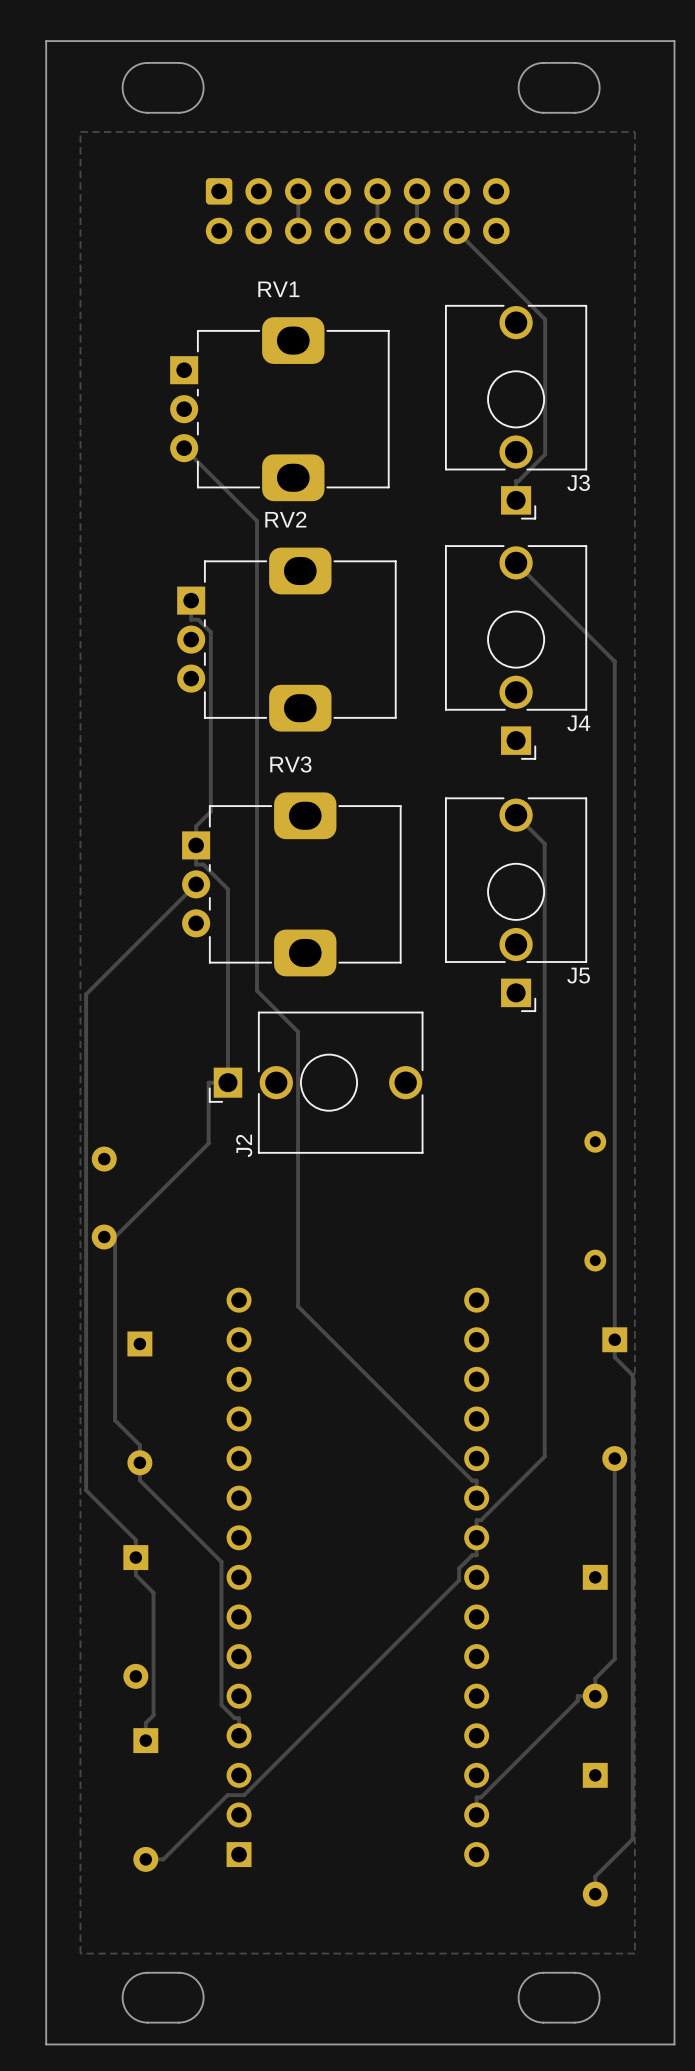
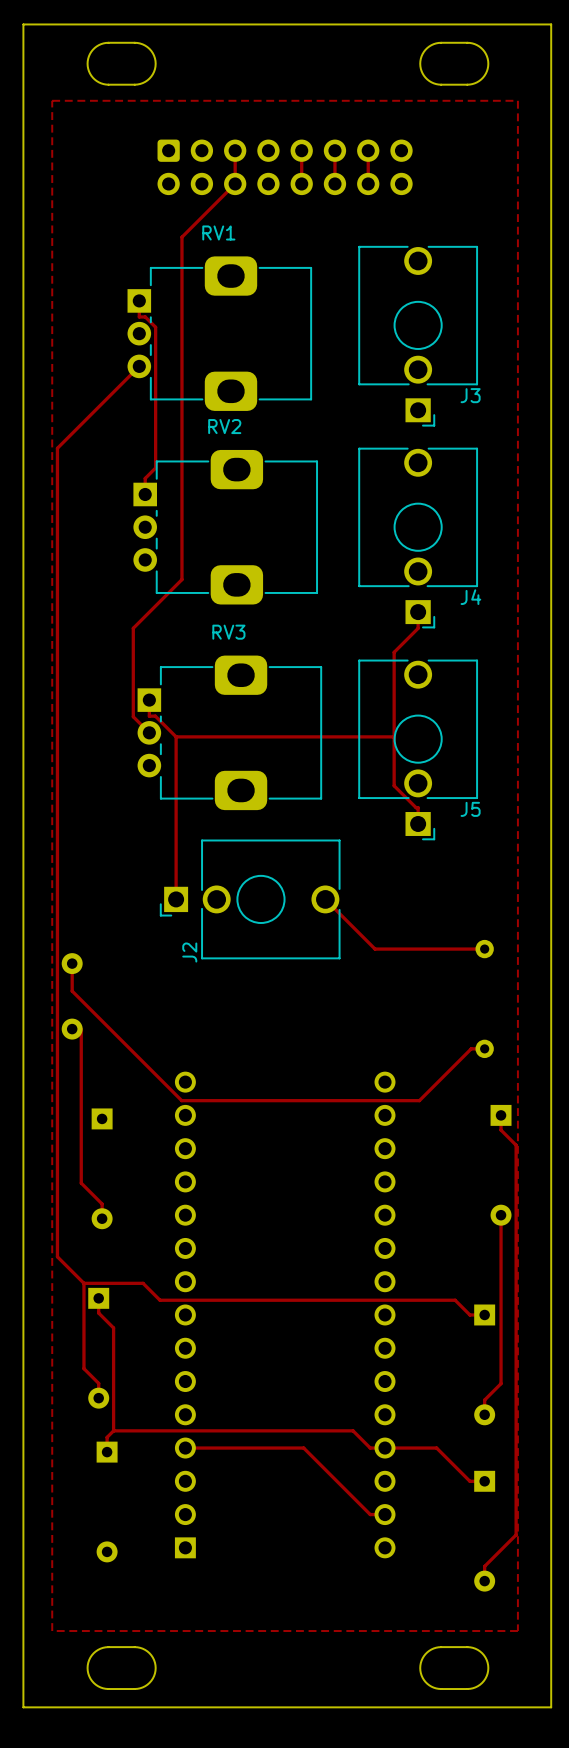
track: (456, 230) (545, 319) (545, 454) (518, 481) (516, 481) (516, 500) -> none
track: (184, 448) (257, 520) (257, 990) (298, 1031) (298, 1306) (472, 1480) (476, 1480) (476, 1498) -> (139, 366) (57, 448) (57, 1256) (83, 1283)
track: (516, 562) (614, 661) (614, 1339) -> none
track: (191, 600) (191, 619) (198, 619) (210, 632) (210, 811) (196, 826) (196, 845) -> (145, 494) (145, 478) (155, 468) (155, 327) (145, 316) (139, 316) (139, 300)
track: none -> (418, 612) (418, 628) (394, 652) (394, 785) (418, 807) (418, 823)
track: (516, 815) (544, 843) (544, 1456) (481, 1520) (476, 1520) (476, 1555) (472, 1555) (459, 1568) (459, 1580) (244, 1795) (227, 1795) (163, 1859) (145, 1859) -> none
track: (196, 884) (86, 994) (86, 1490) (135, 1540) (135, 1557) -> (149, 732) (133, 716) (133, 628) (181, 579) (181, 237) (235, 183)
track: none -> (176, 736) (394, 736)
track: (227, 1082) (208, 1082) (208, 1143) (115, 1237) (104, 1237) -> none
track: none -> (325, 899) (375, 949) (484, 949)
track: none -> (72, 963) (72, 991) (181, 1100) (419, 1100) (471, 1048) (484, 1048)
track: (139, 1462) (139, 1480) (221, 1561) (221, 1705) (234, 1718) (239, 1718) (239, 1735) -> none
track: none -> (83, 1283) (83, 1368) (98, 1383) (98, 1398)
track: none -> (83, 1283) (143, 1283) (159, 1300) (455, 1300) (469, 1314) (484, 1314)
track: (595, 1696) (577, 1696) (577, 1700) (480, 1797) (476, 1797) (476, 1814) -> (185, 1448) (303, 1448) (370, 1514) (385, 1514)
track: none -> (113, 1430) (353, 1430) (370, 1448) (436, 1448) (469, 1481) (484, 1481)

